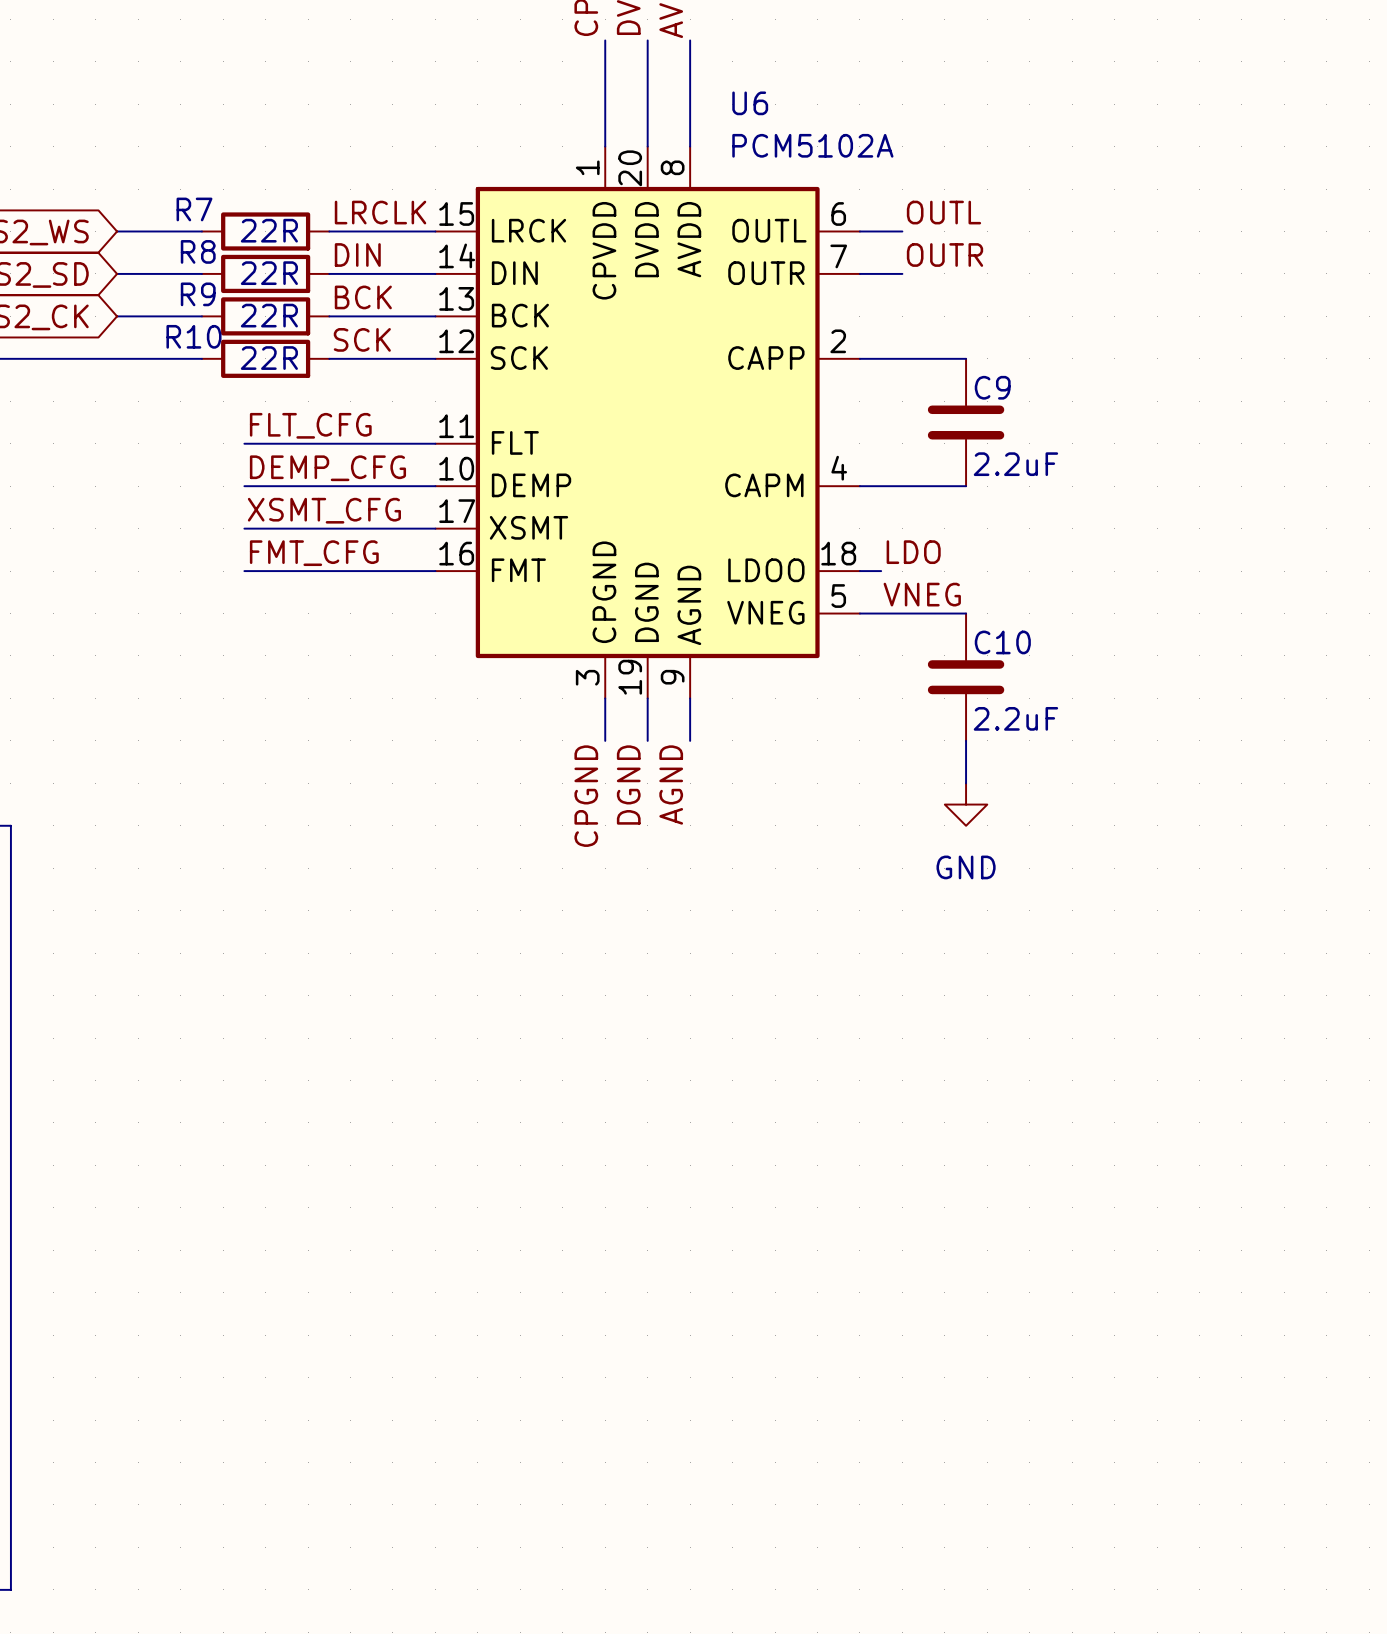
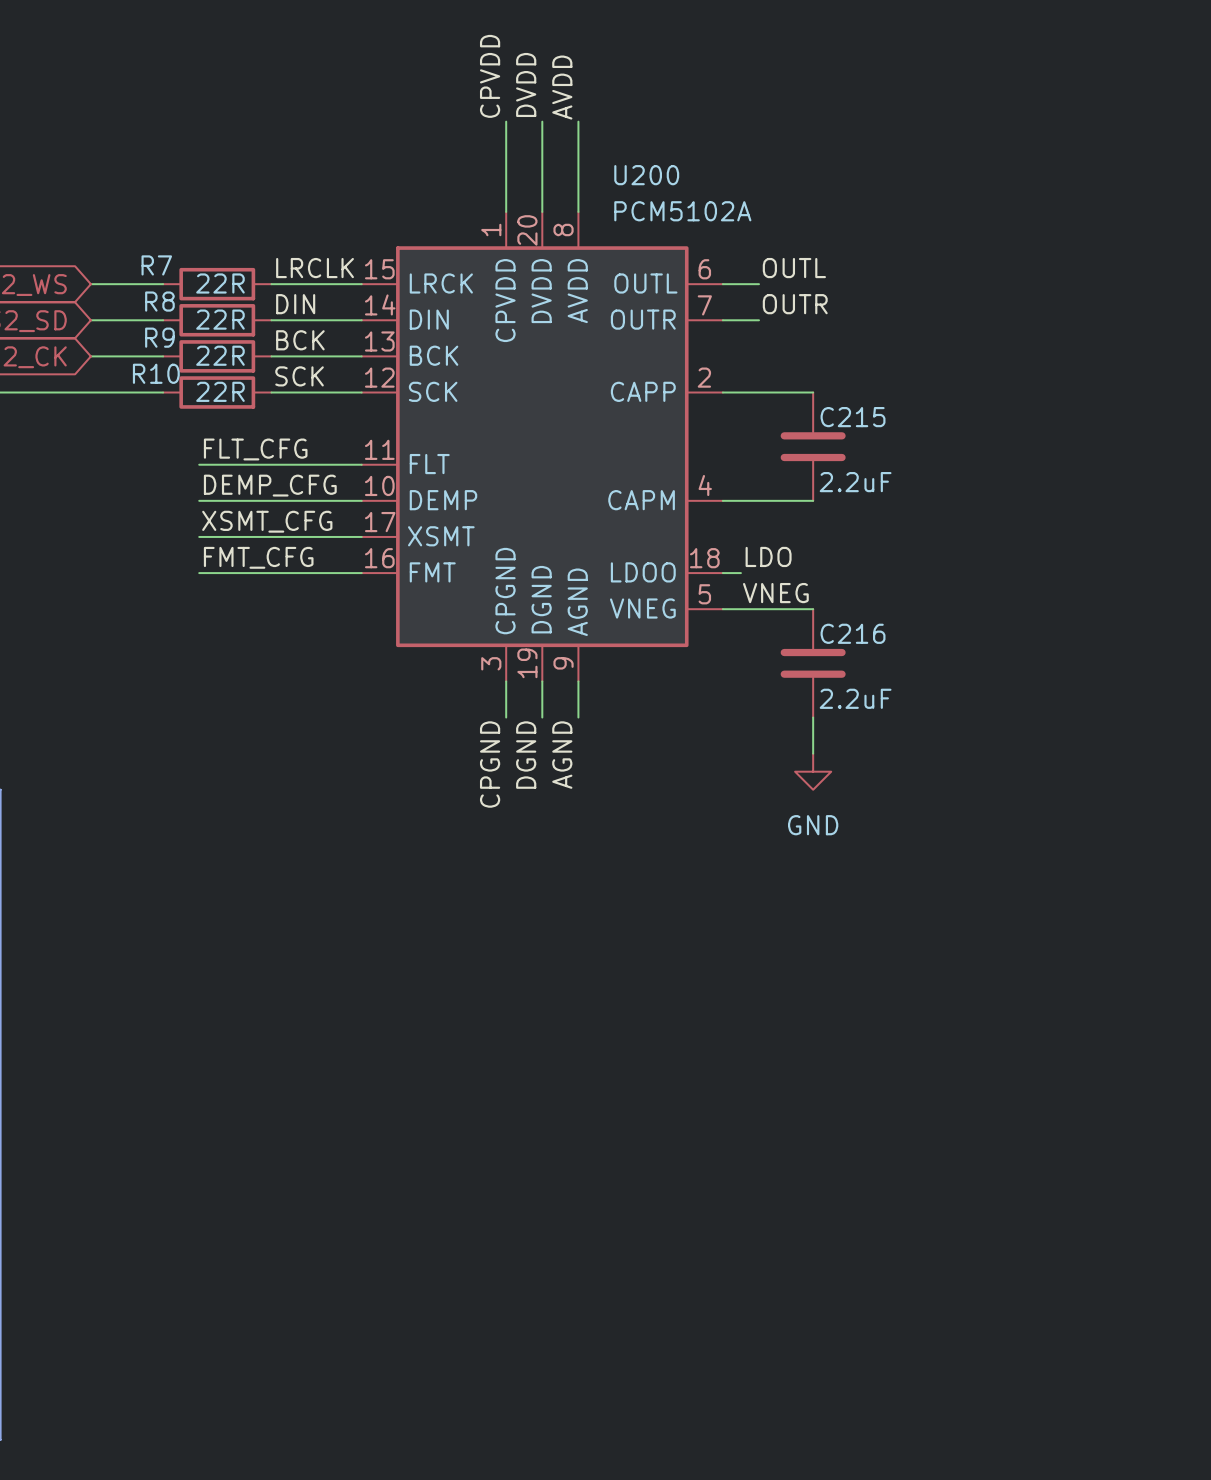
U6 name: U6 (750, 103) -> U200 (646, 175)
C9 name: C9 (992, 387) -> C215 (853, 417)
C10 name: C10 (1002, 642) -> C216 (853, 633)

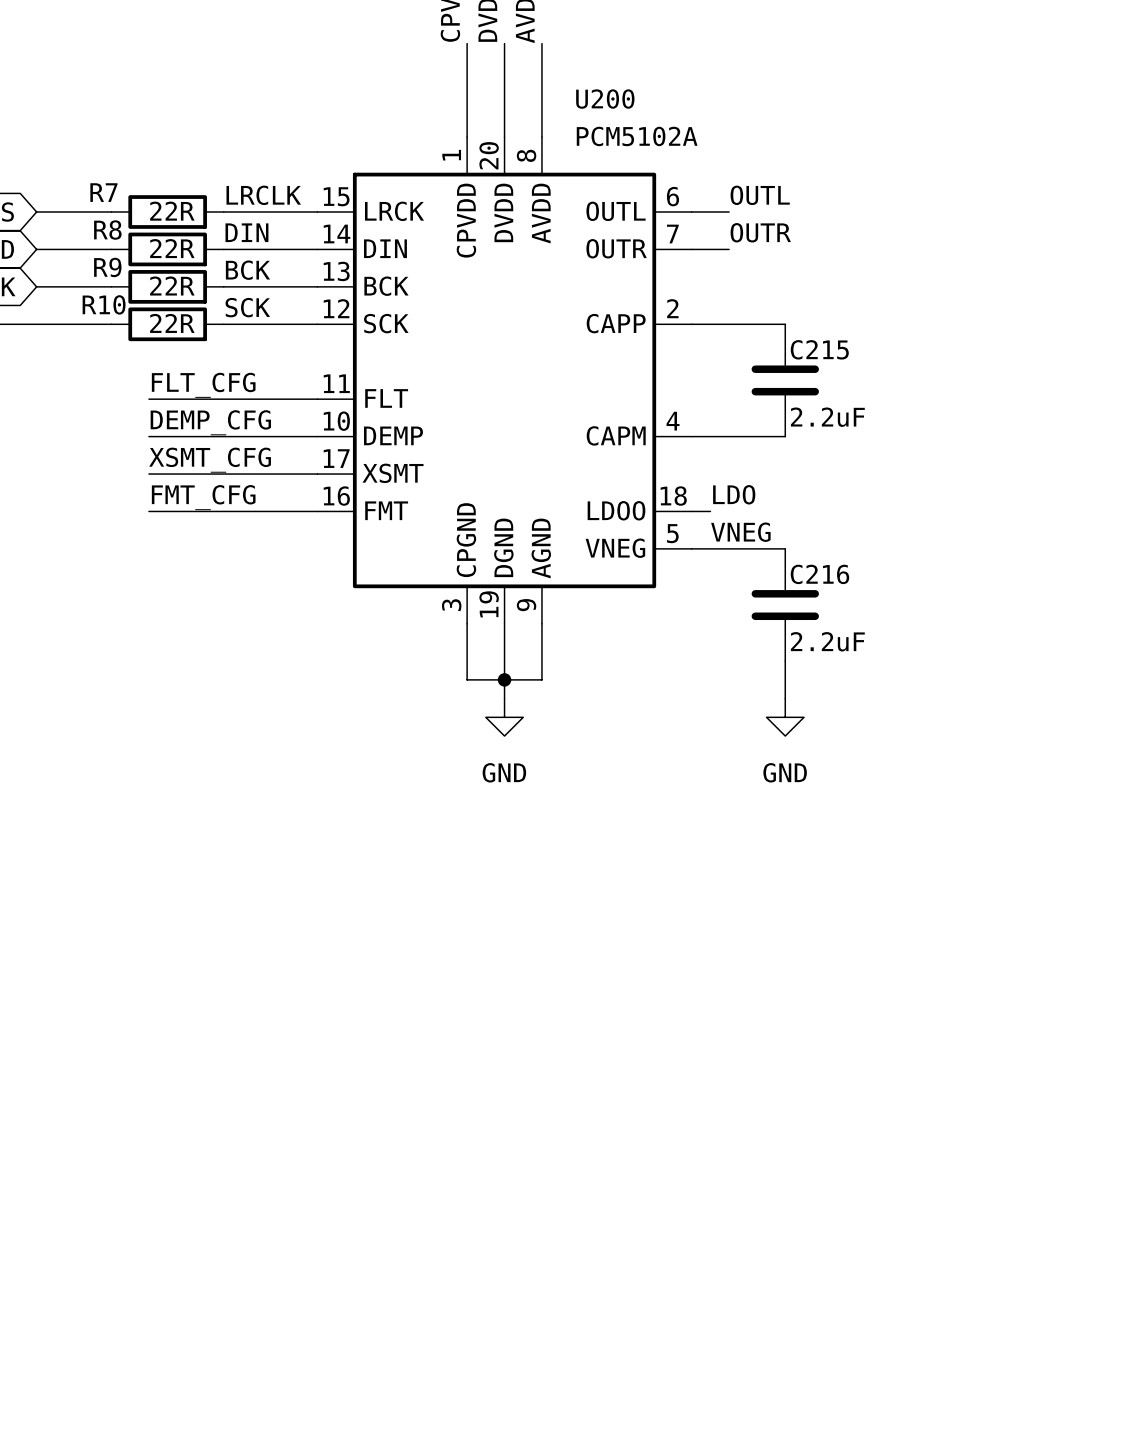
wire: none -> (467, 661) (467, 679) (541, 679) (541, 661)
wire: none -> (504, 661) (504, 698)
junction: none -> (504, 679)
label: DGND (526, 755) -> none
label: AGND (562, 755) -> none
label: CPGND (490, 764) -> none
power symbol: none -> GND (504, 717)

